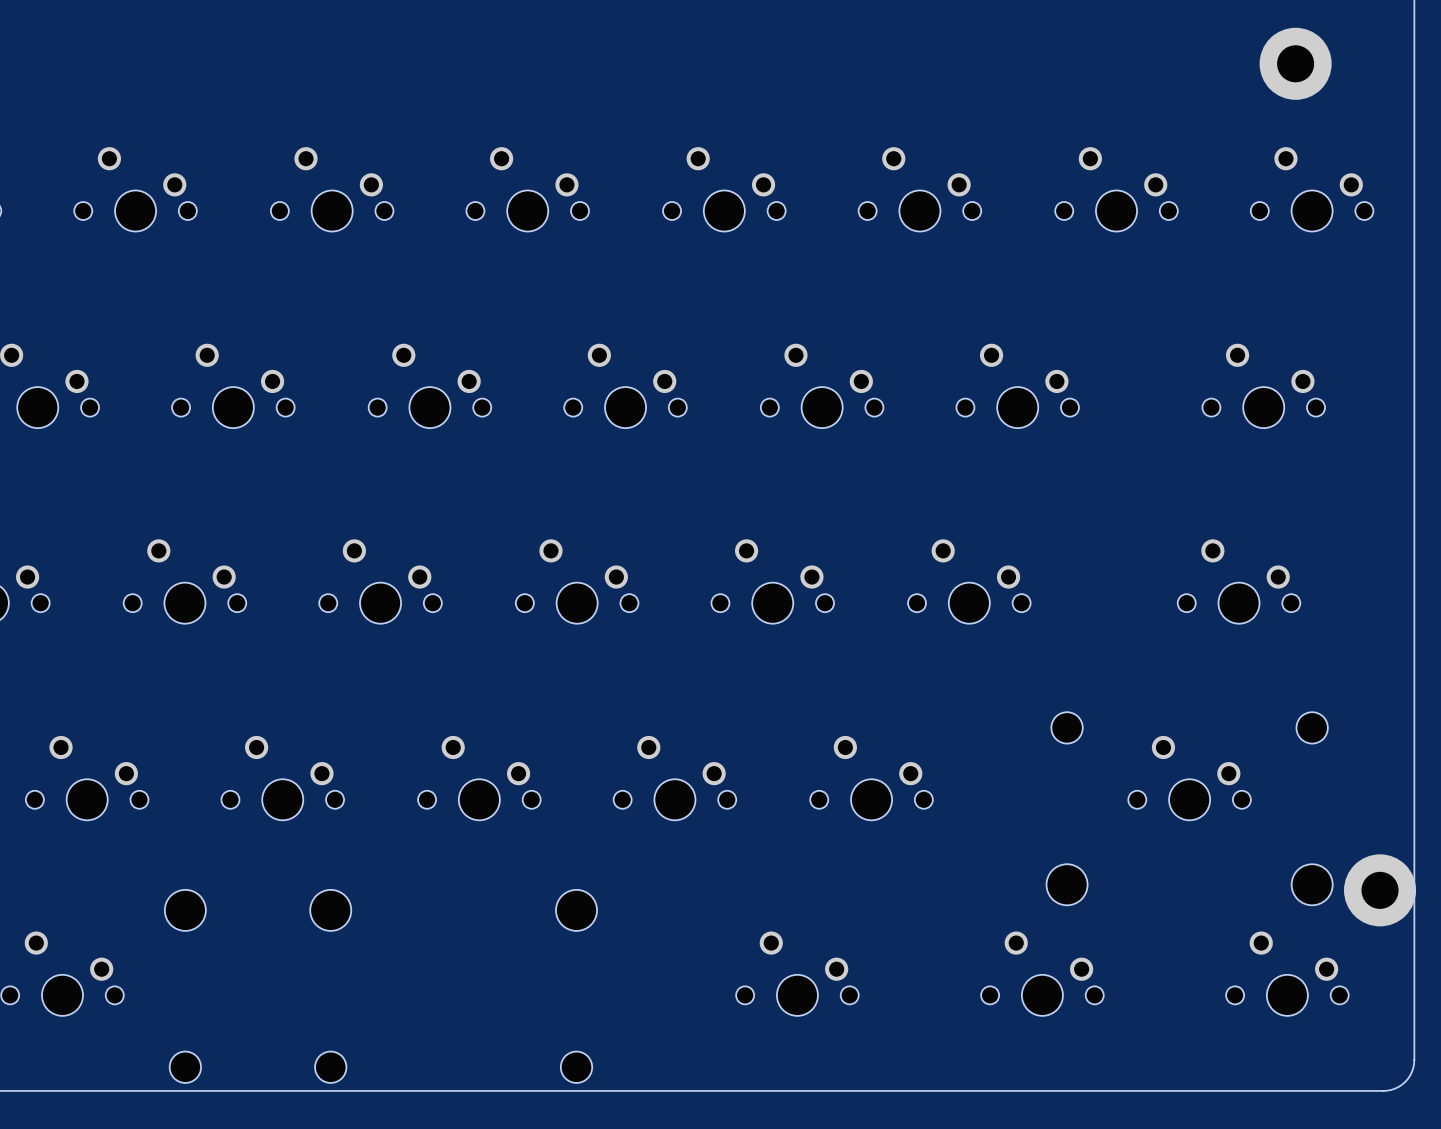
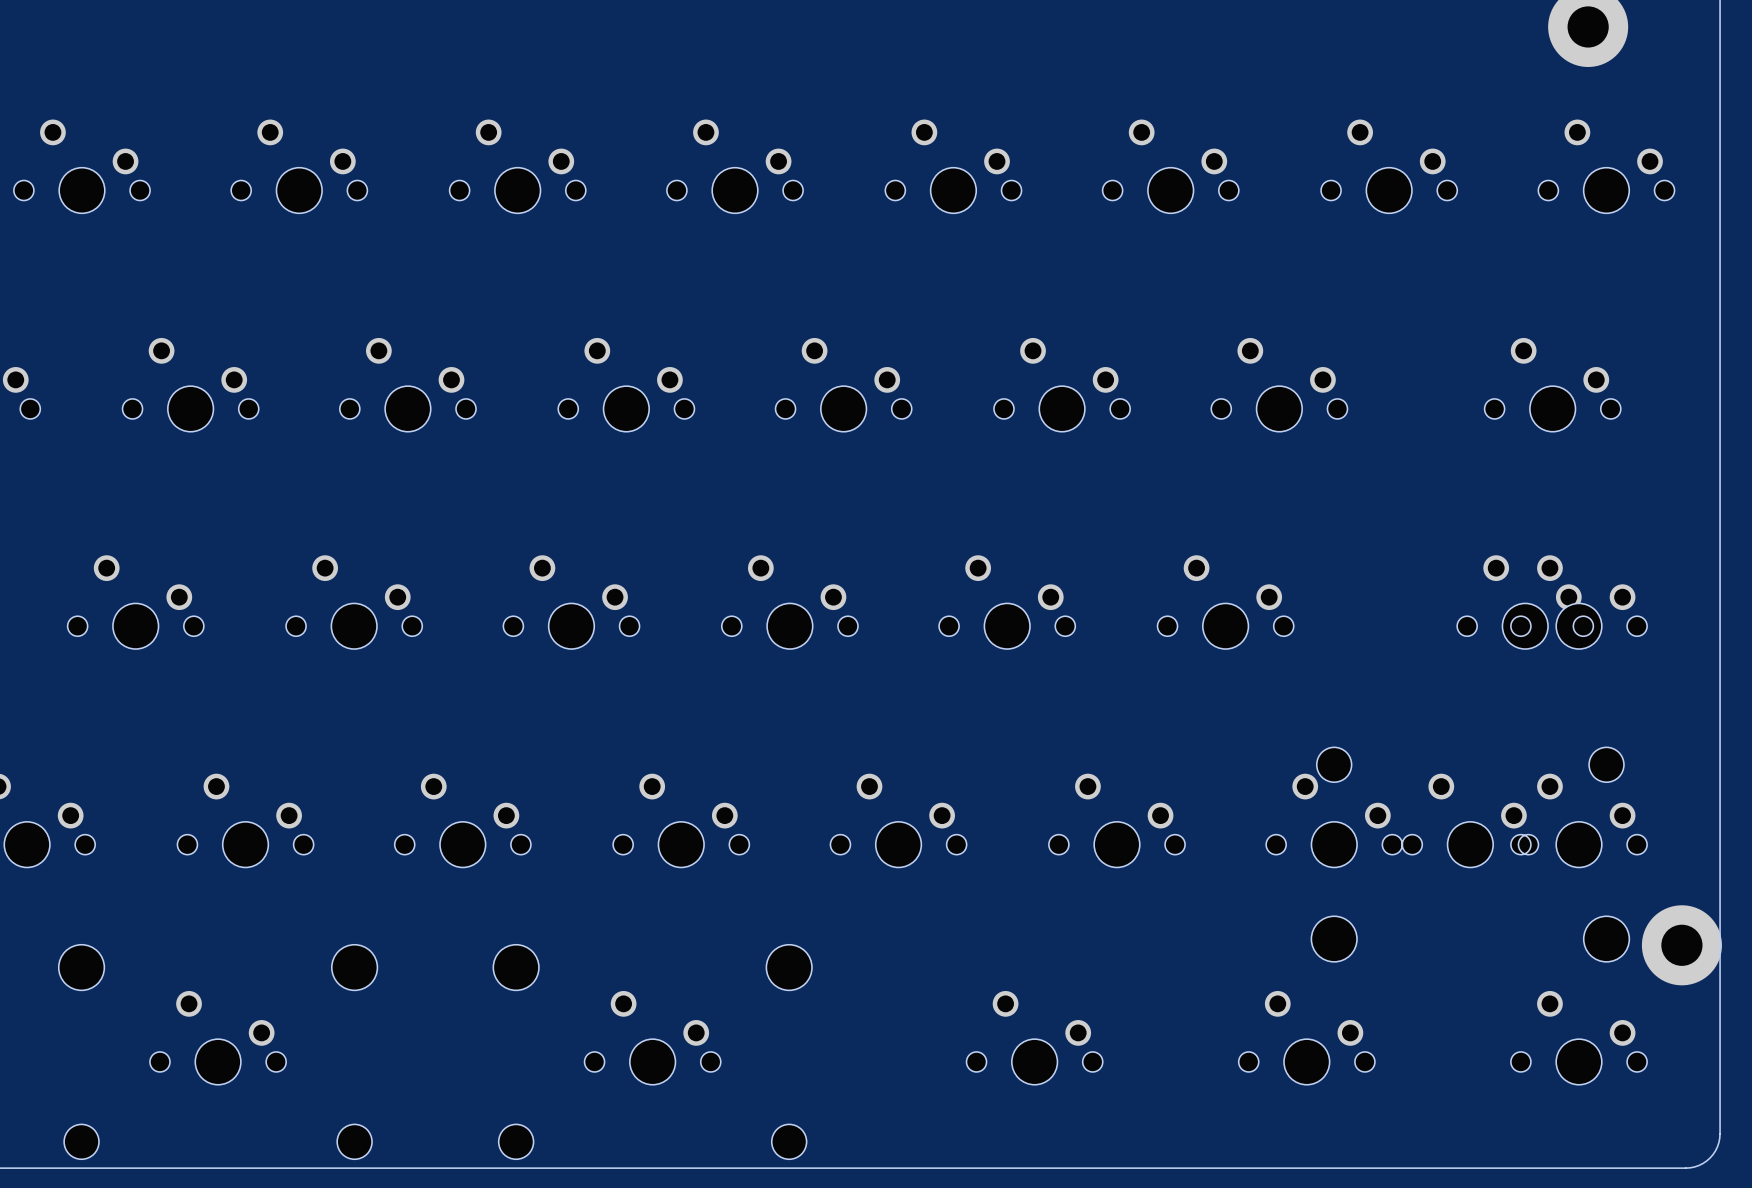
part: none -> (1579, 602)
part: none -> (1334, 820)
part: none -> (1579, 820)
part: none -> (652, 1037)

